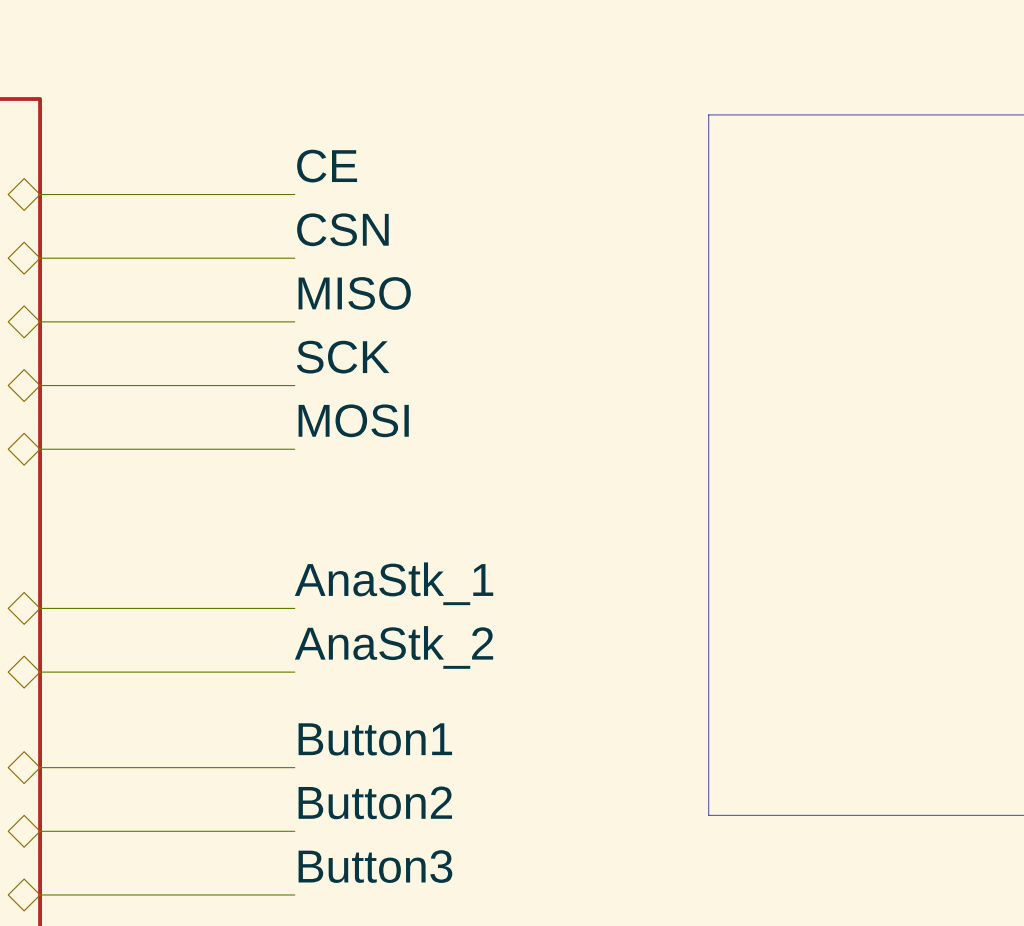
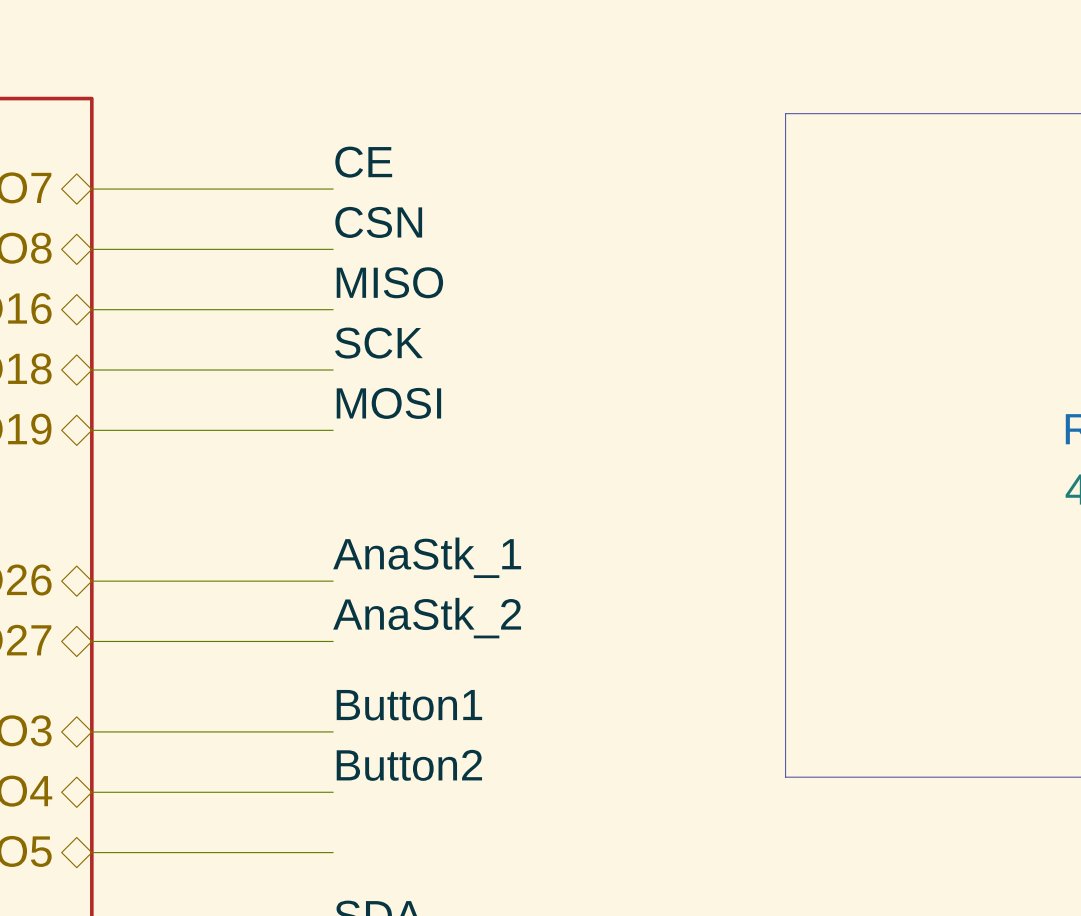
line: (772, 114) (708, 114) (708, 815) (772, 815) -> (785, 113) (785, 777)
label: Button3 (375, 866) -> none

